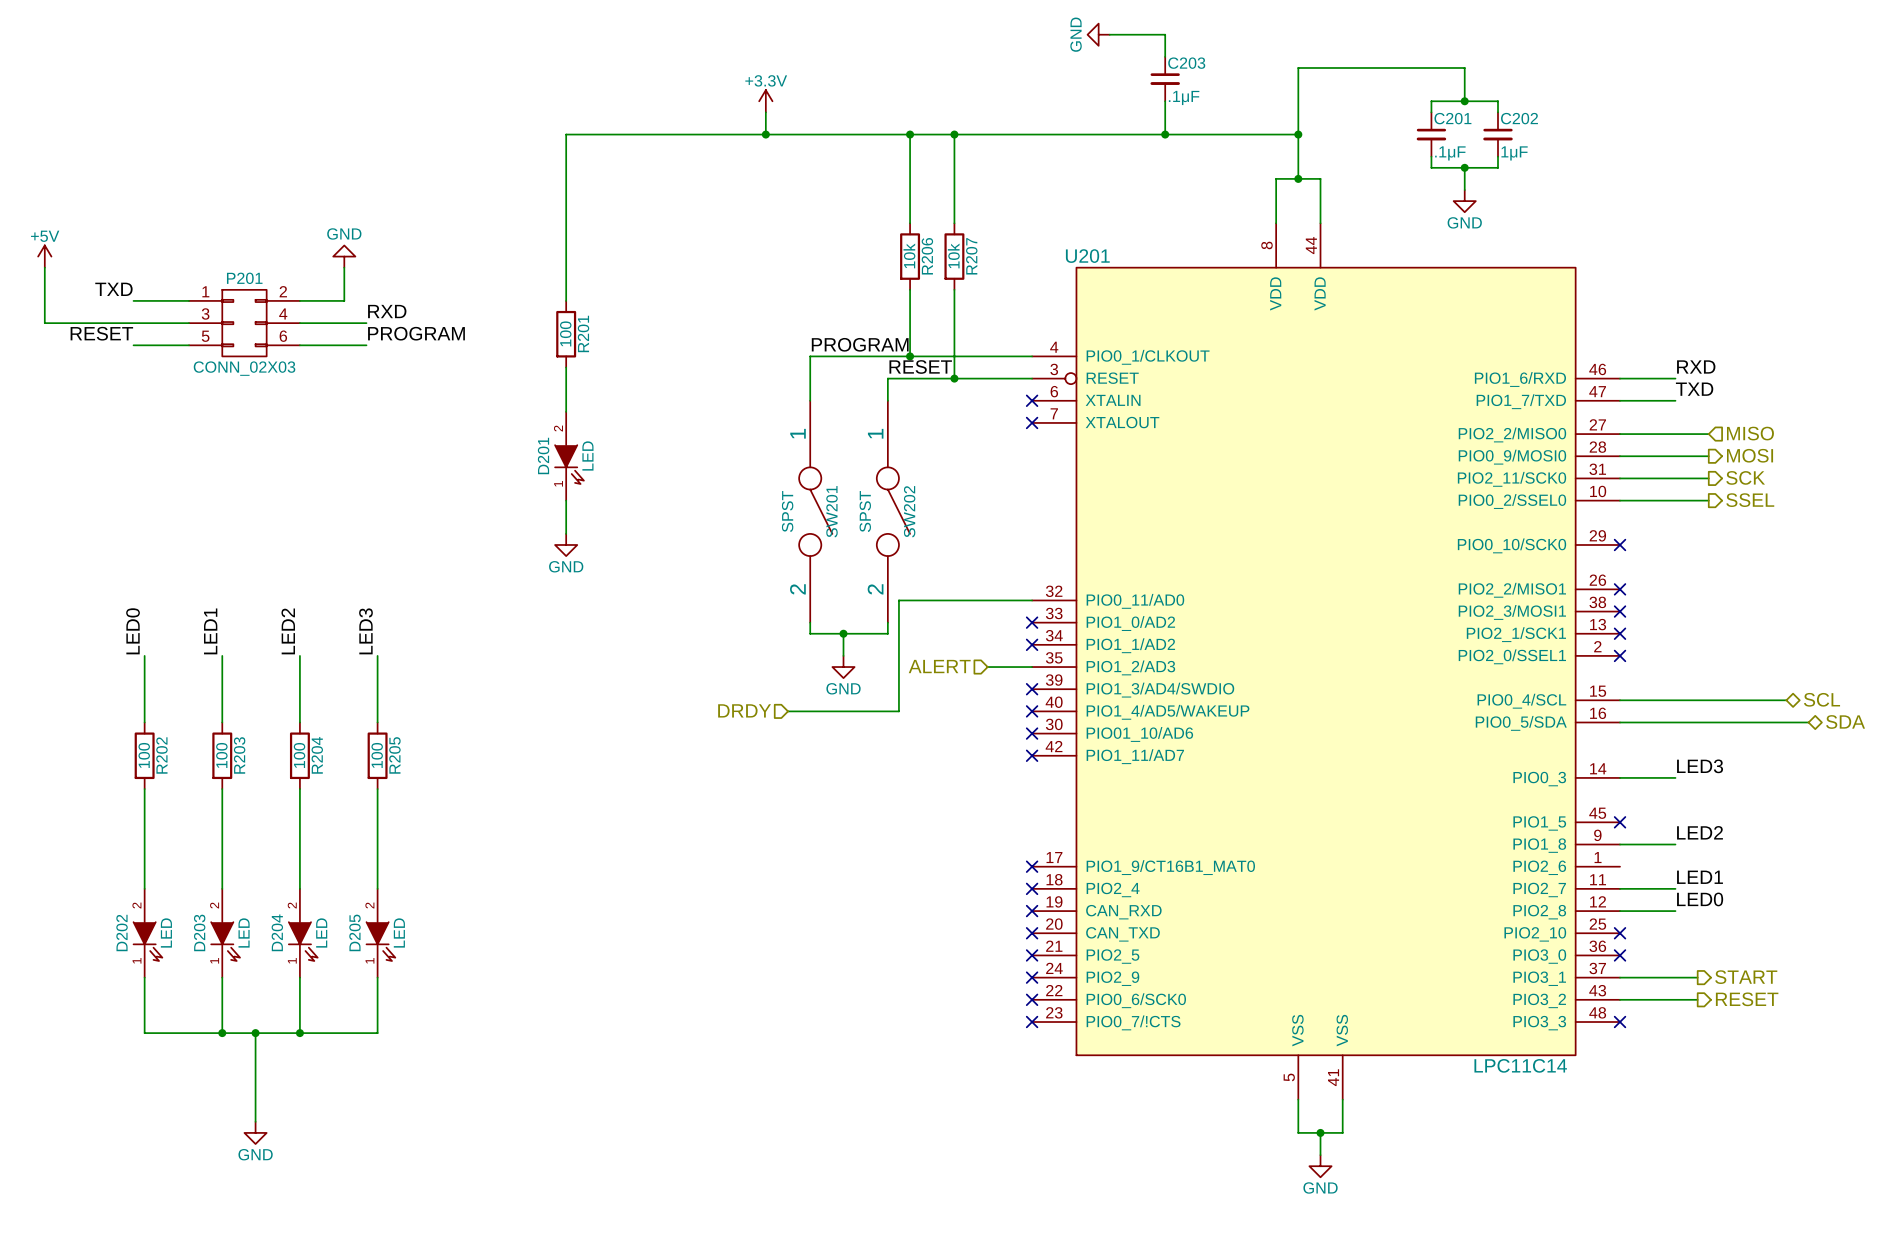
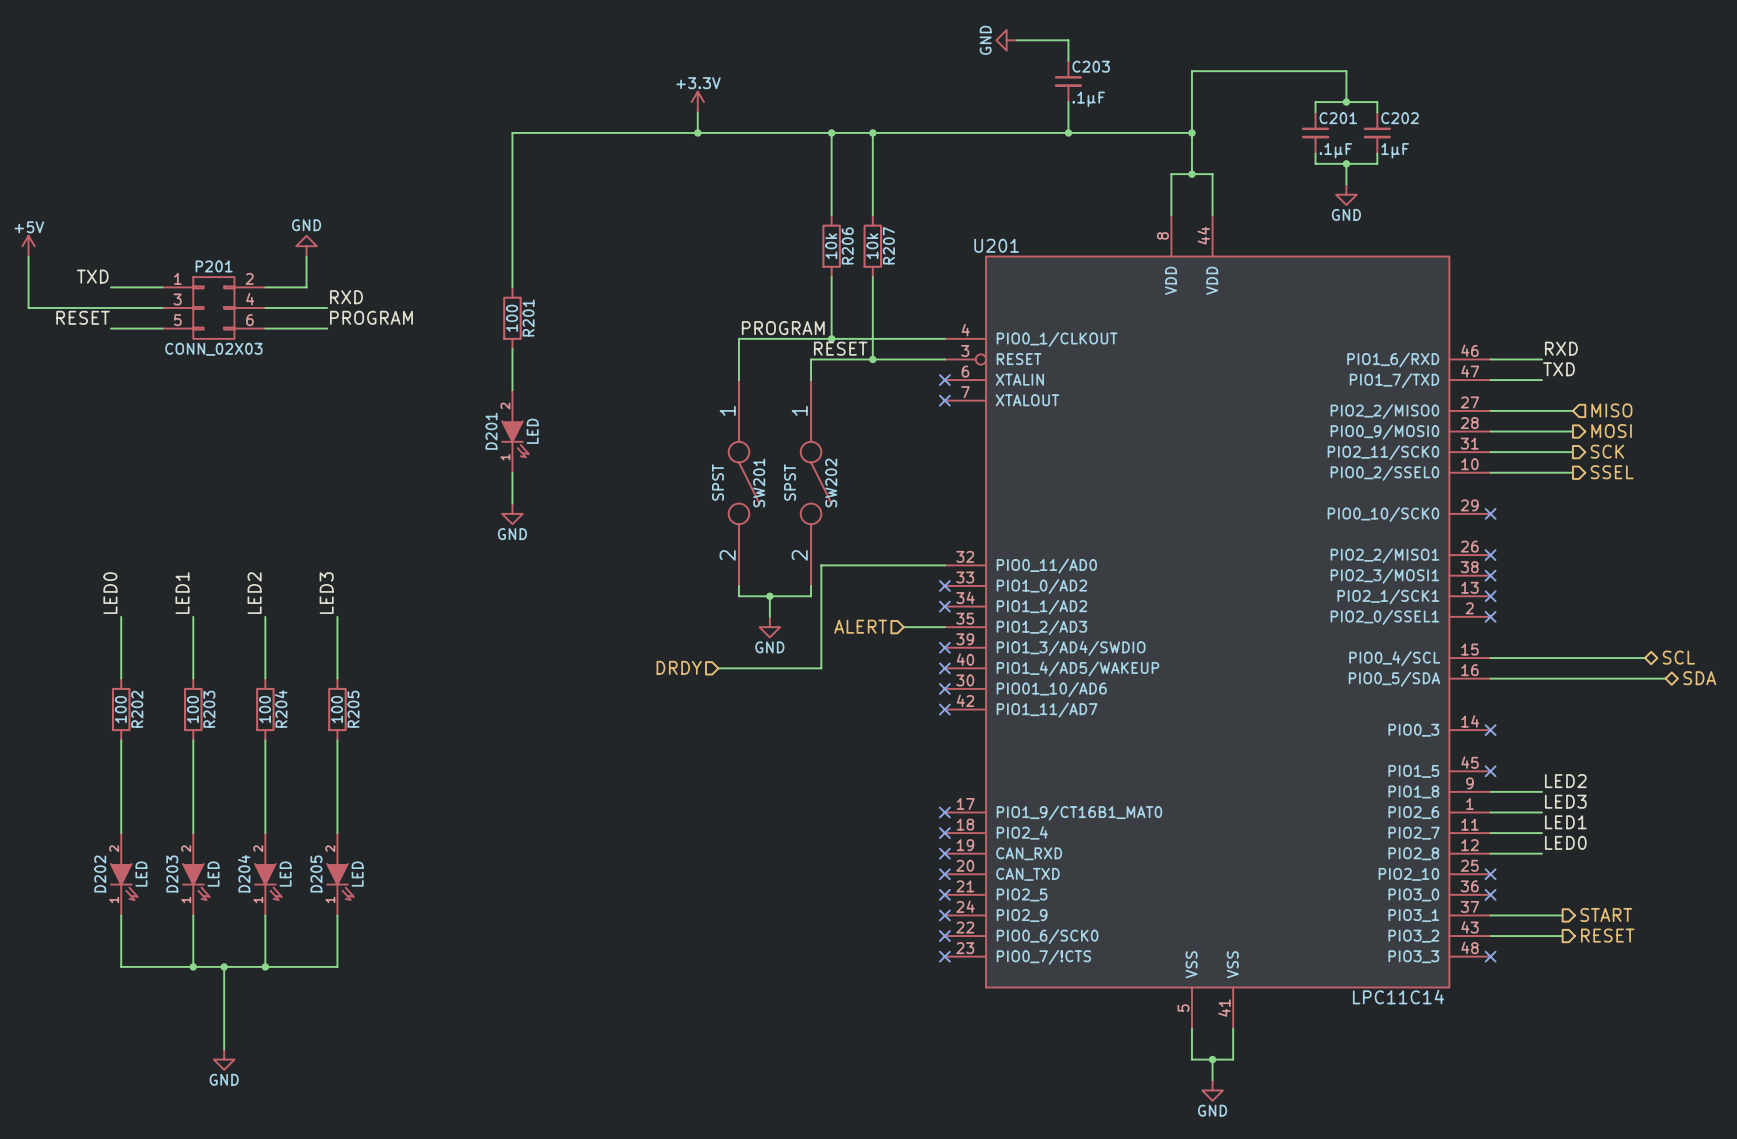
label position: LED3 (1700, 766) -> LED3 (1565, 801)
wire: (1620, 777) (1675, 777) -> (1490, 812) (1542, 812)
no-connect mark: none -> (1490, 730)

